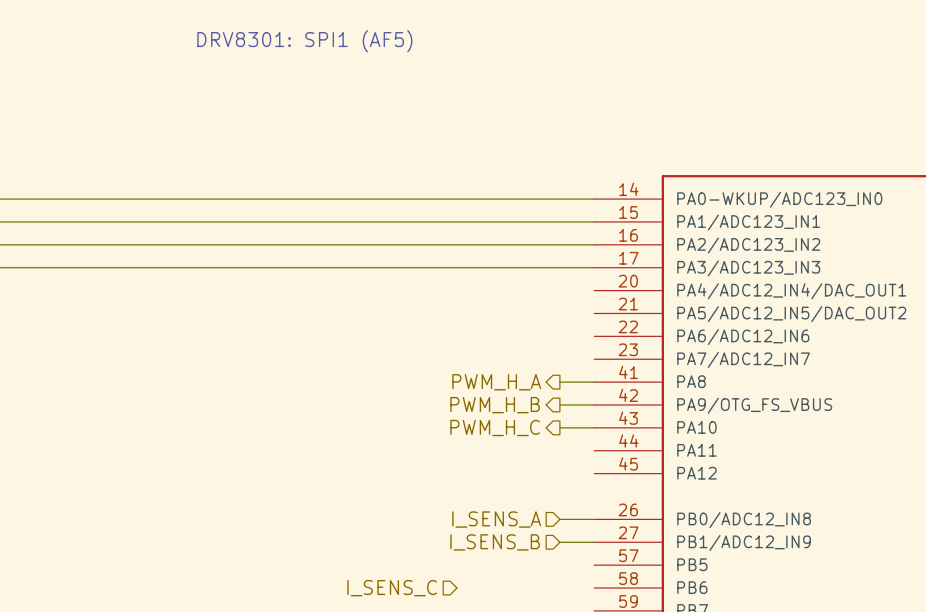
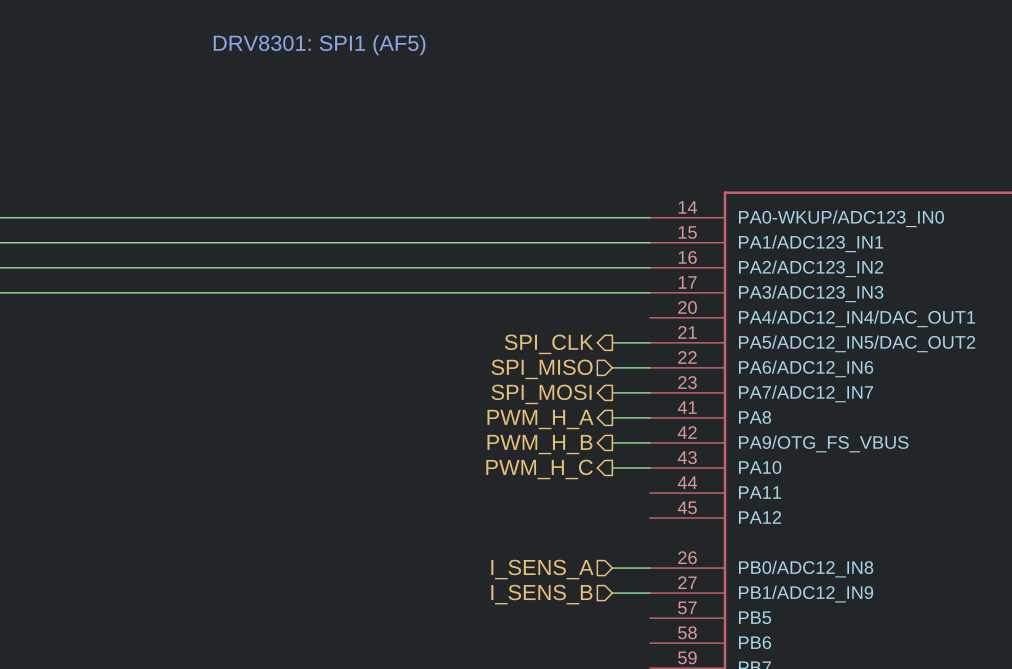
hierarchical label: none -> SPI_CLK (549, 344)
wire: none -> (612, 342) (649, 342)
hierarchical label: none -> SPI_MISO (542, 369)
wire: none -> (612, 367) (649, 367)
hierarchical label: none -> SPI_MOSI (541, 394)
wire: none -> (612, 392) (649, 392)
hierarchical label: I_SENS_C (392, 588) -> none

